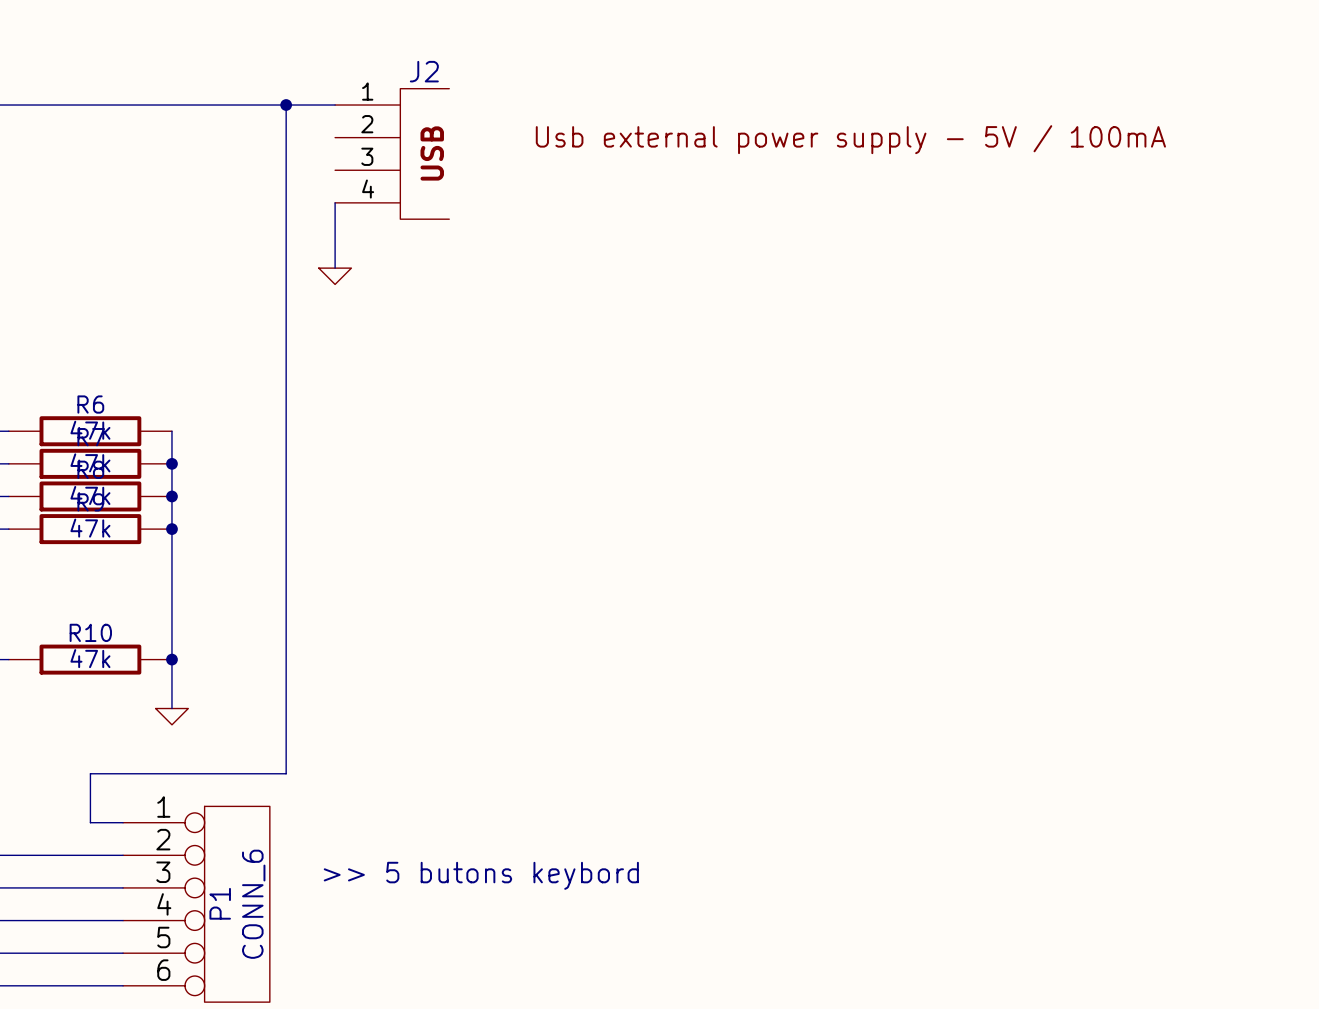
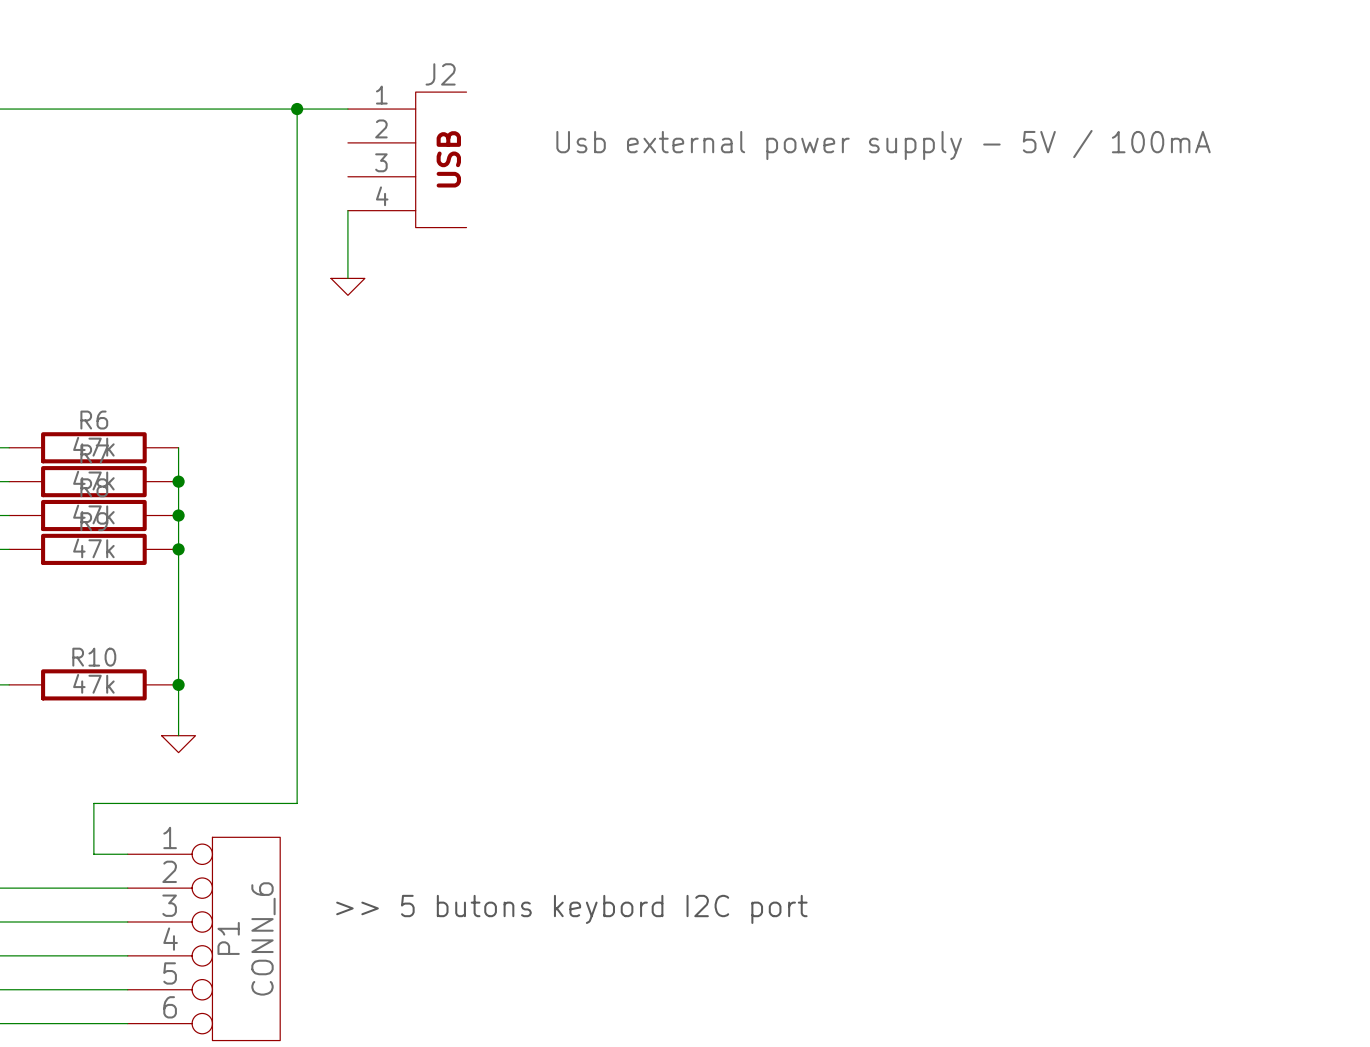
text: >> 5 butons keybord (481, 875) -> >> 5 butons keybord I2C port (571, 909)

